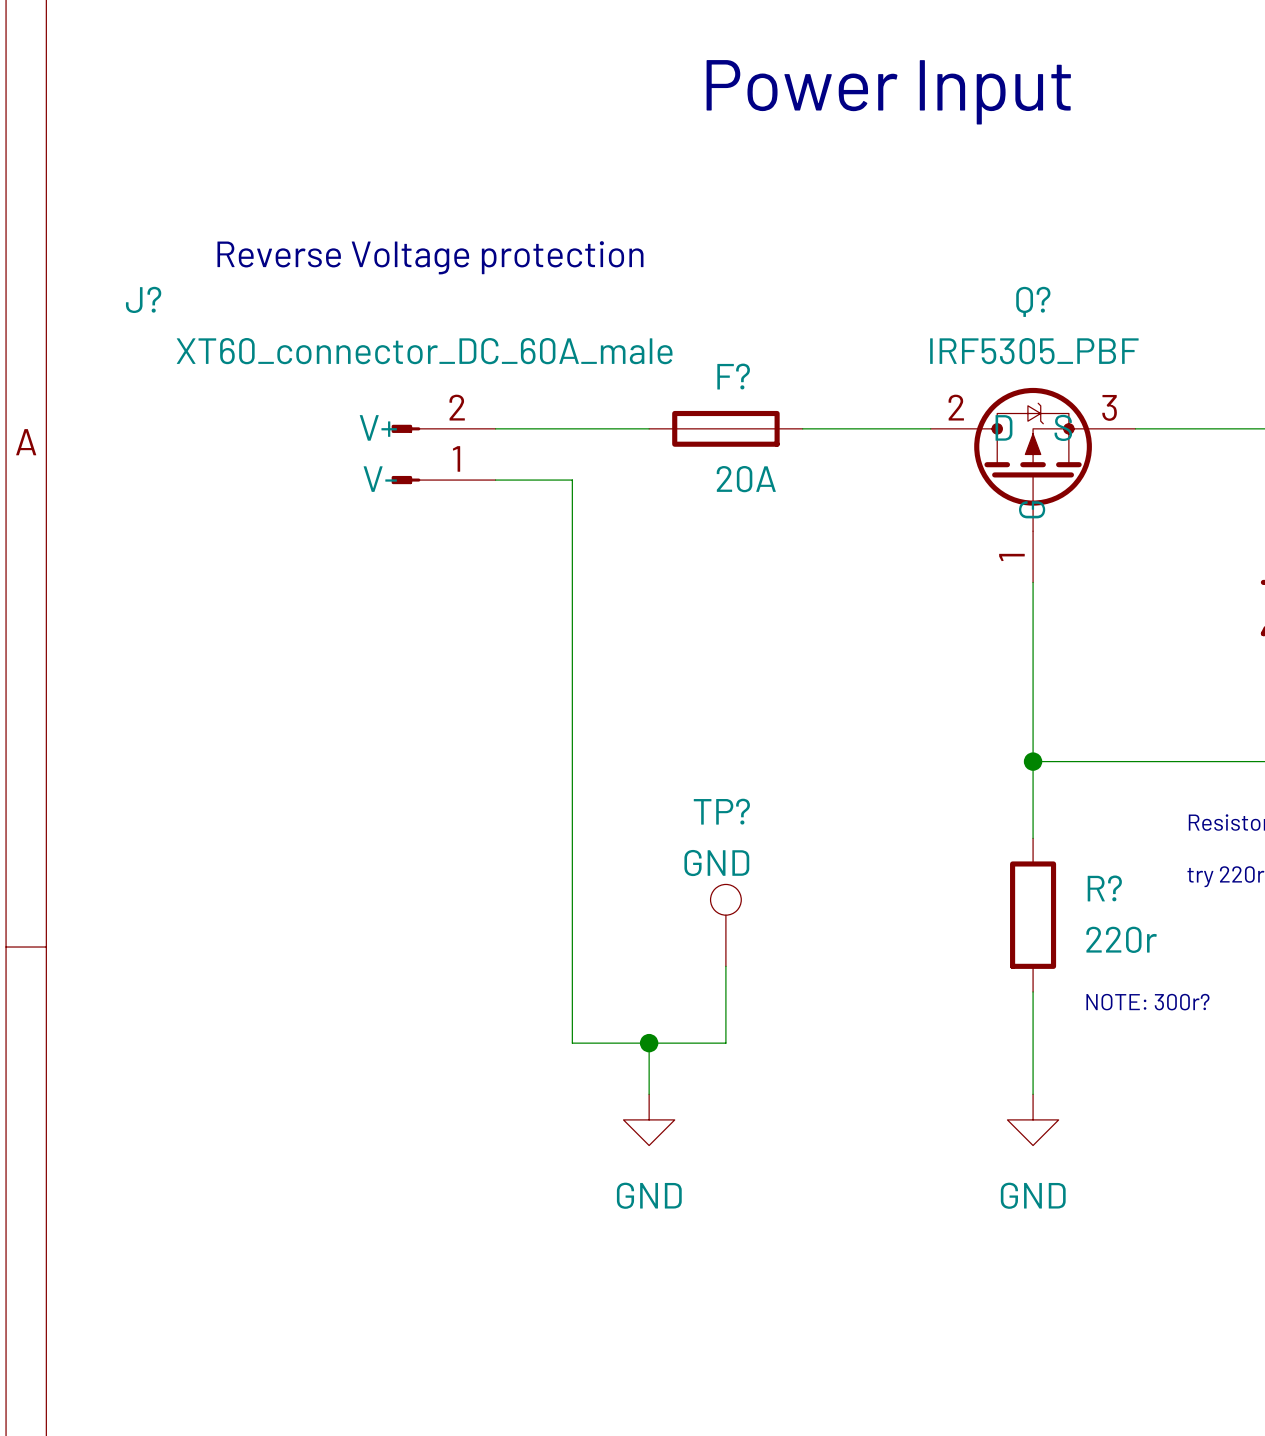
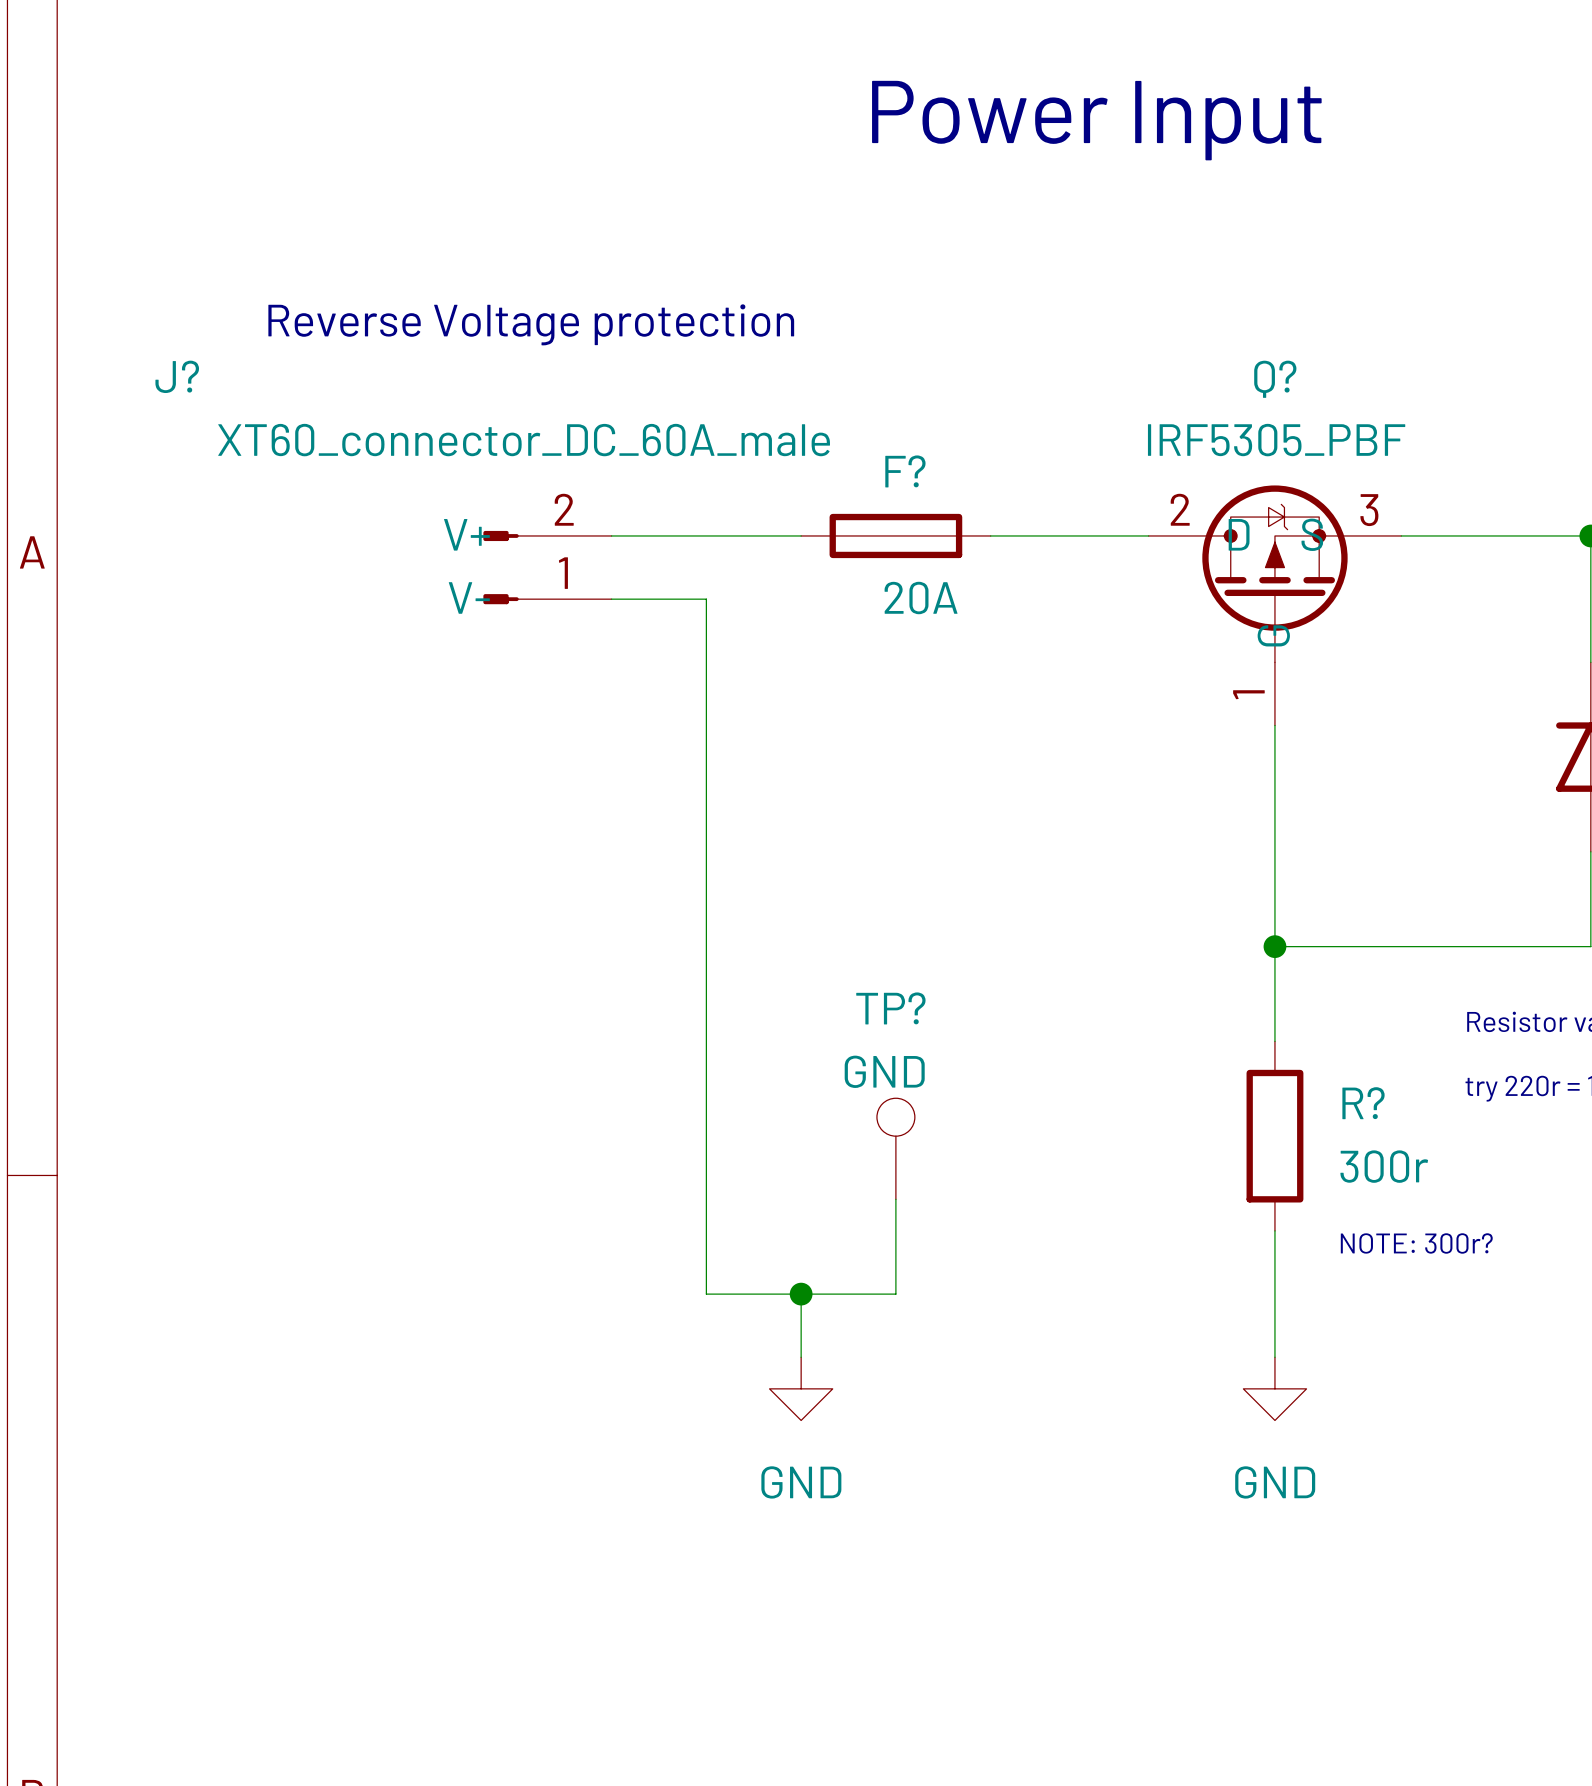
R? value: 220r (1121, 939) -> 300r (1384, 1166)

